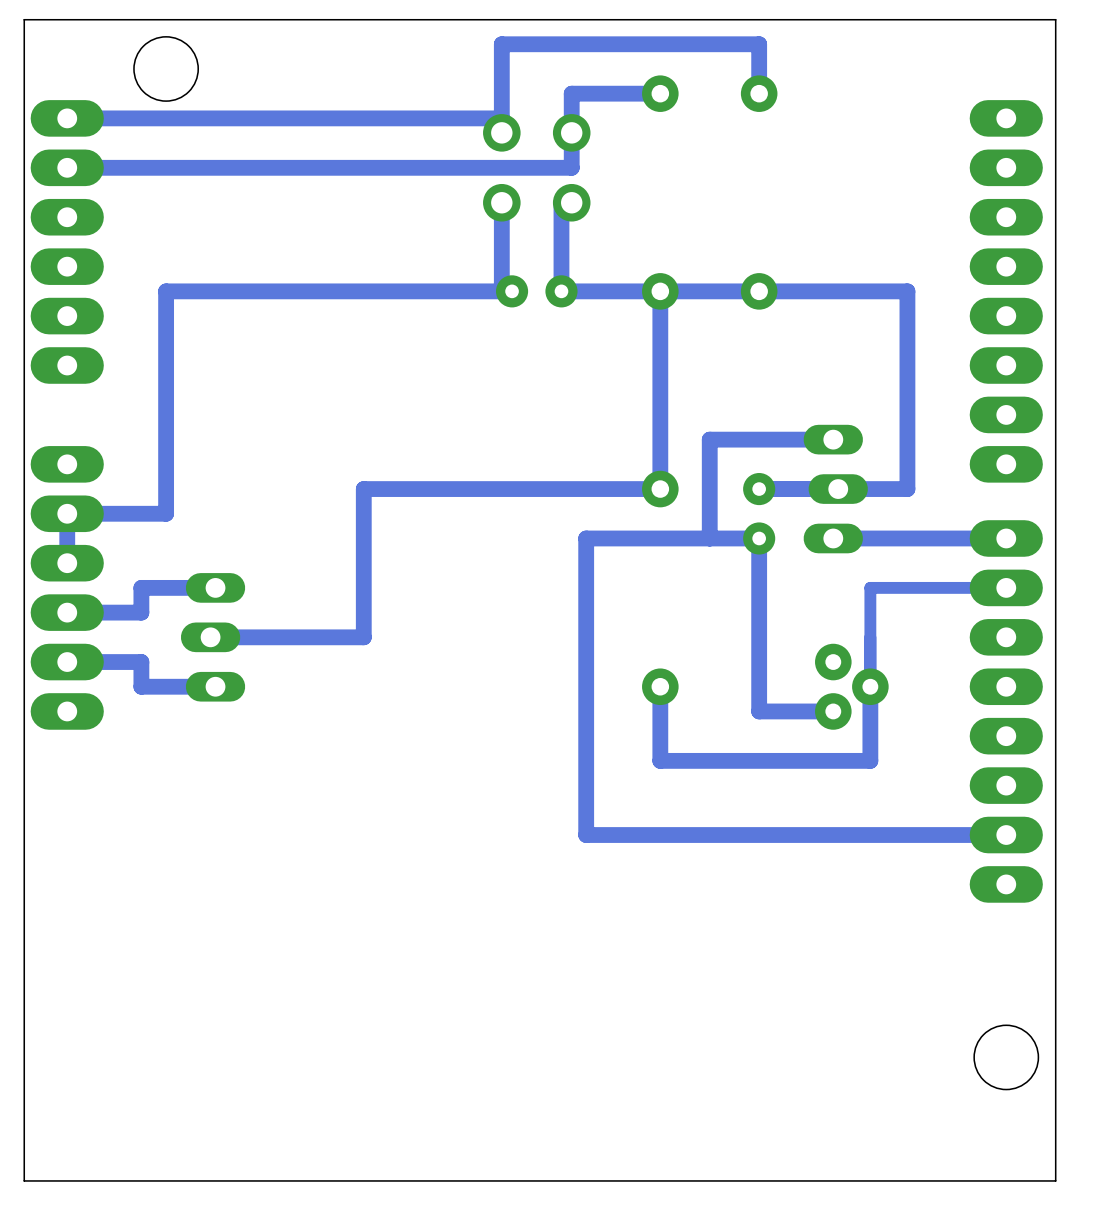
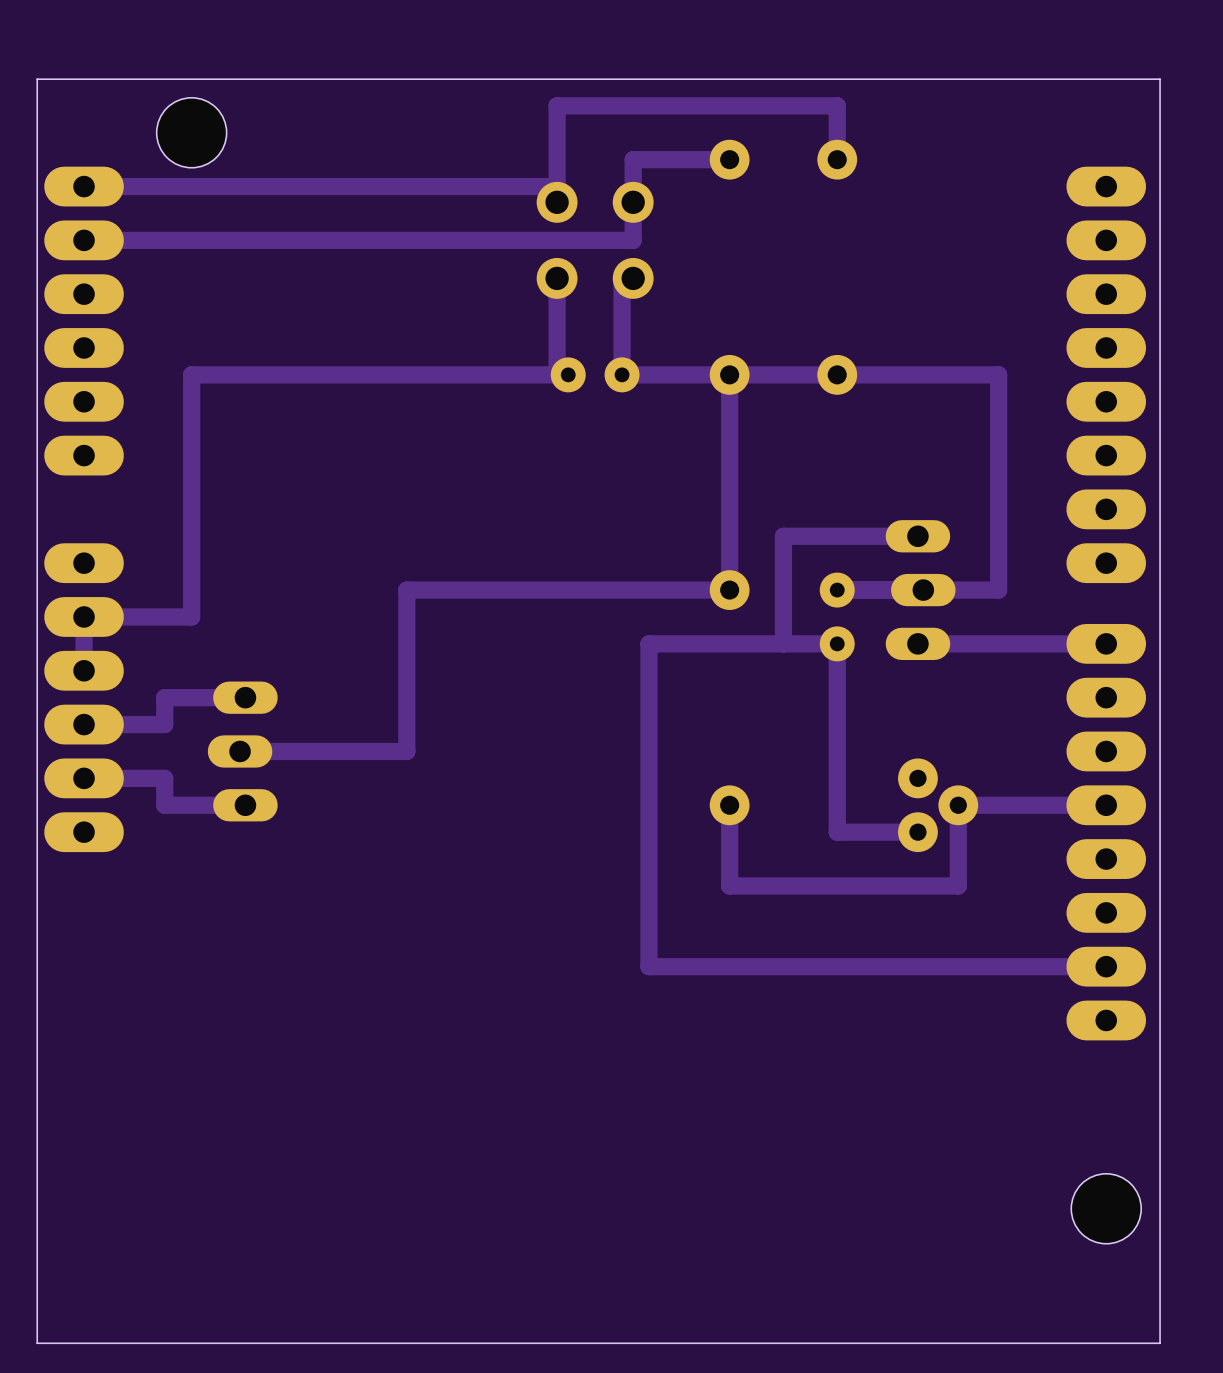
track: (1006, 587) (870, 587) (870, 686) -> (1106, 805) (958, 805)

